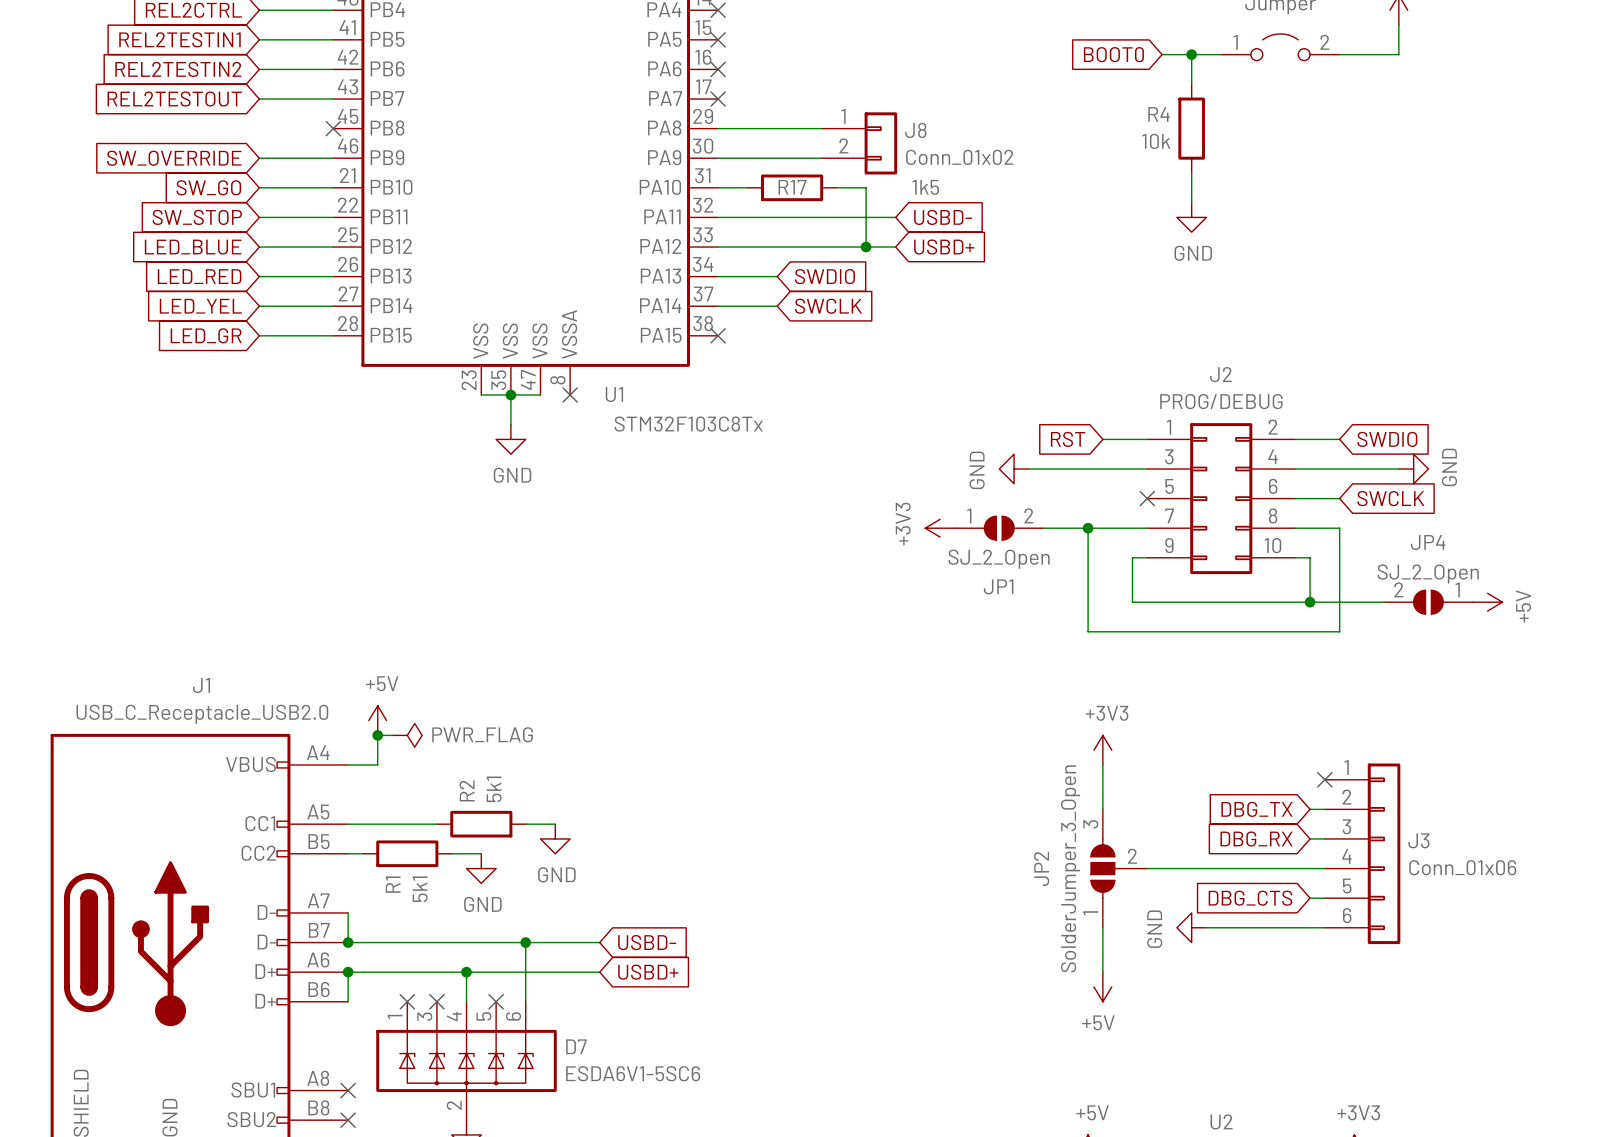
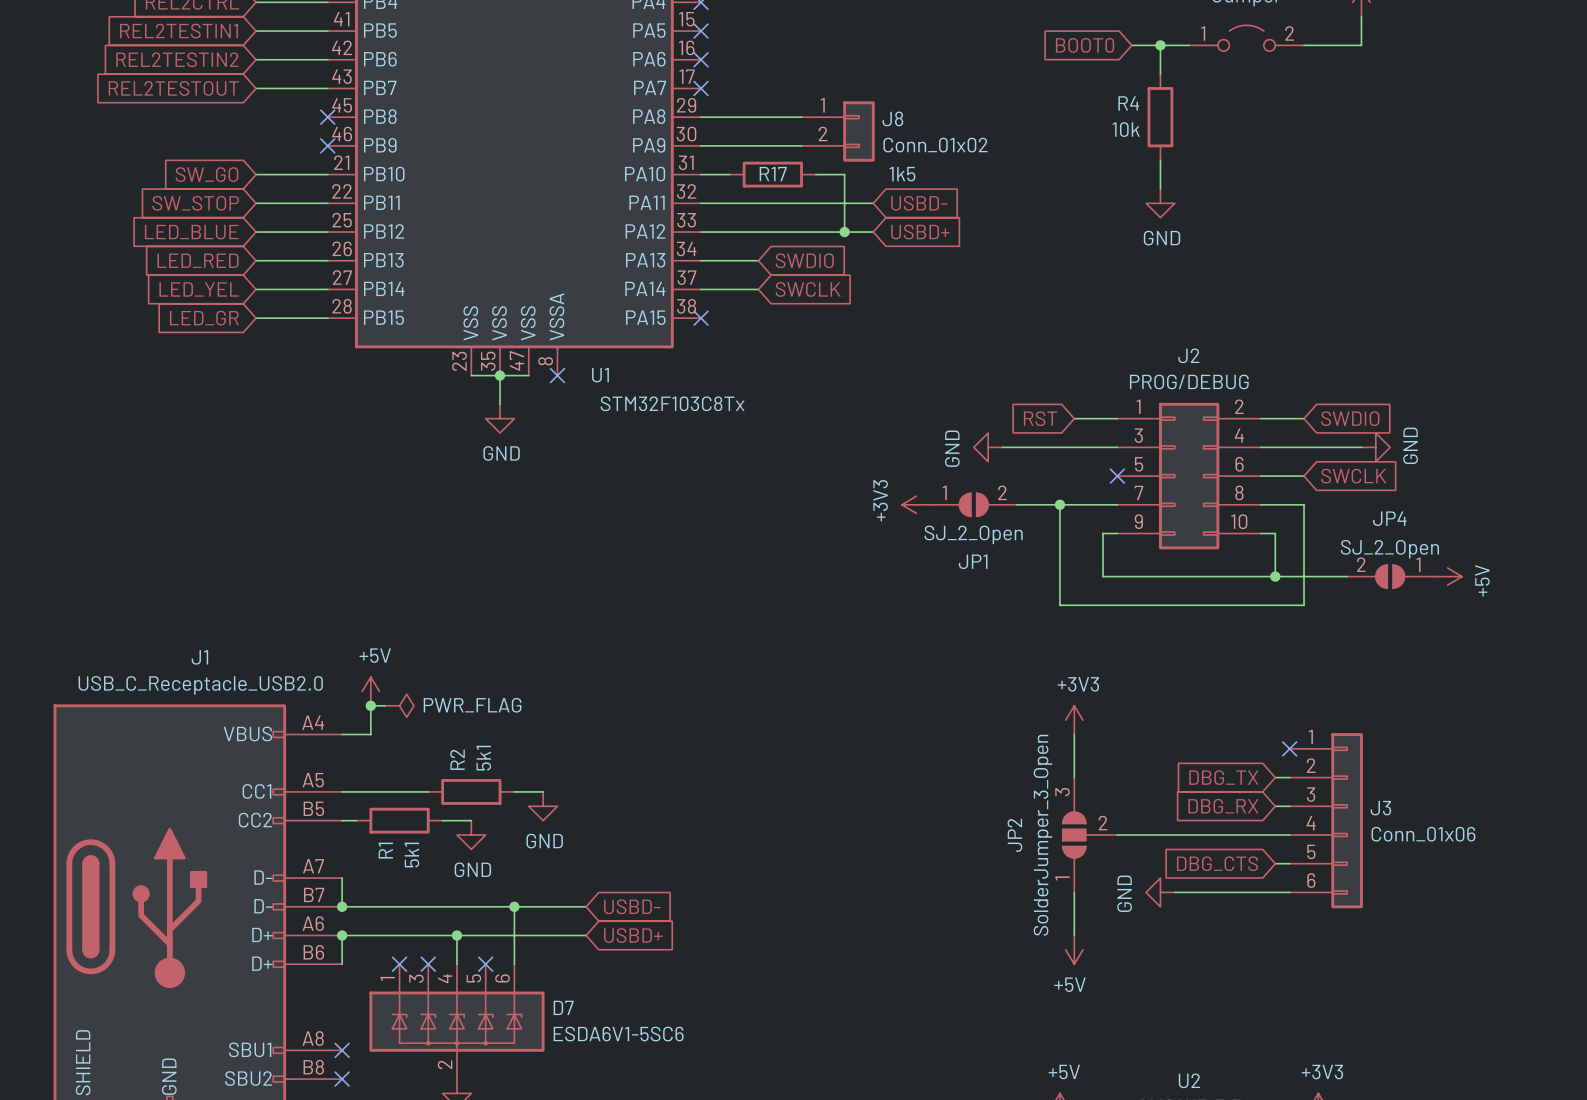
global label: SW_OVERRIDE (174, 158) -> none
wire: (259, 158) (333, 158) -> none
no-connect mark: none -> (327, 145)

